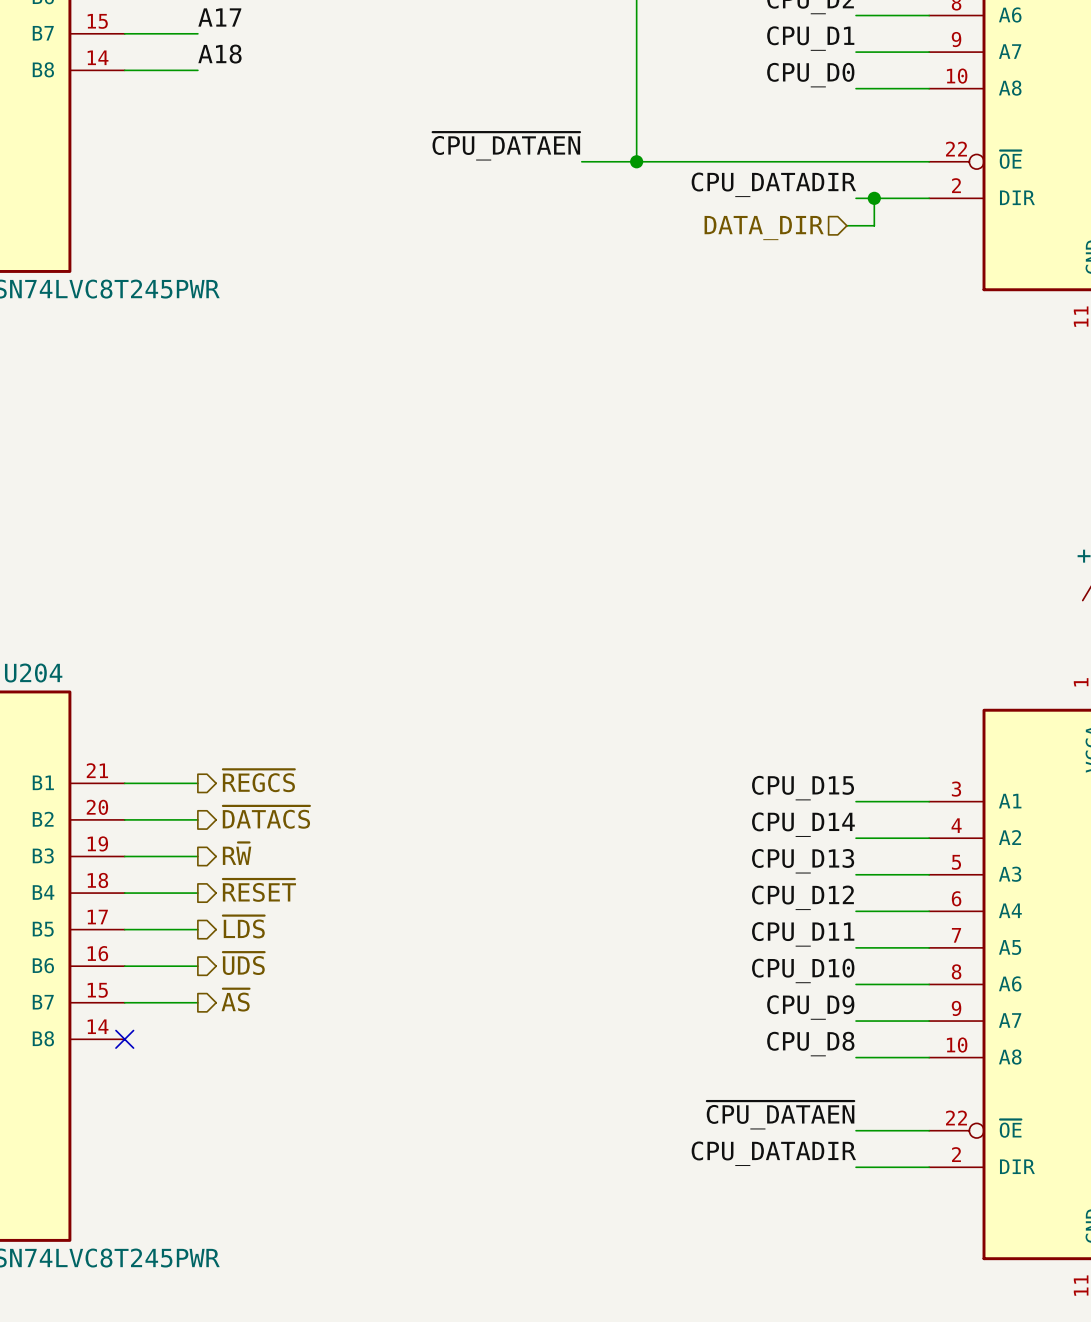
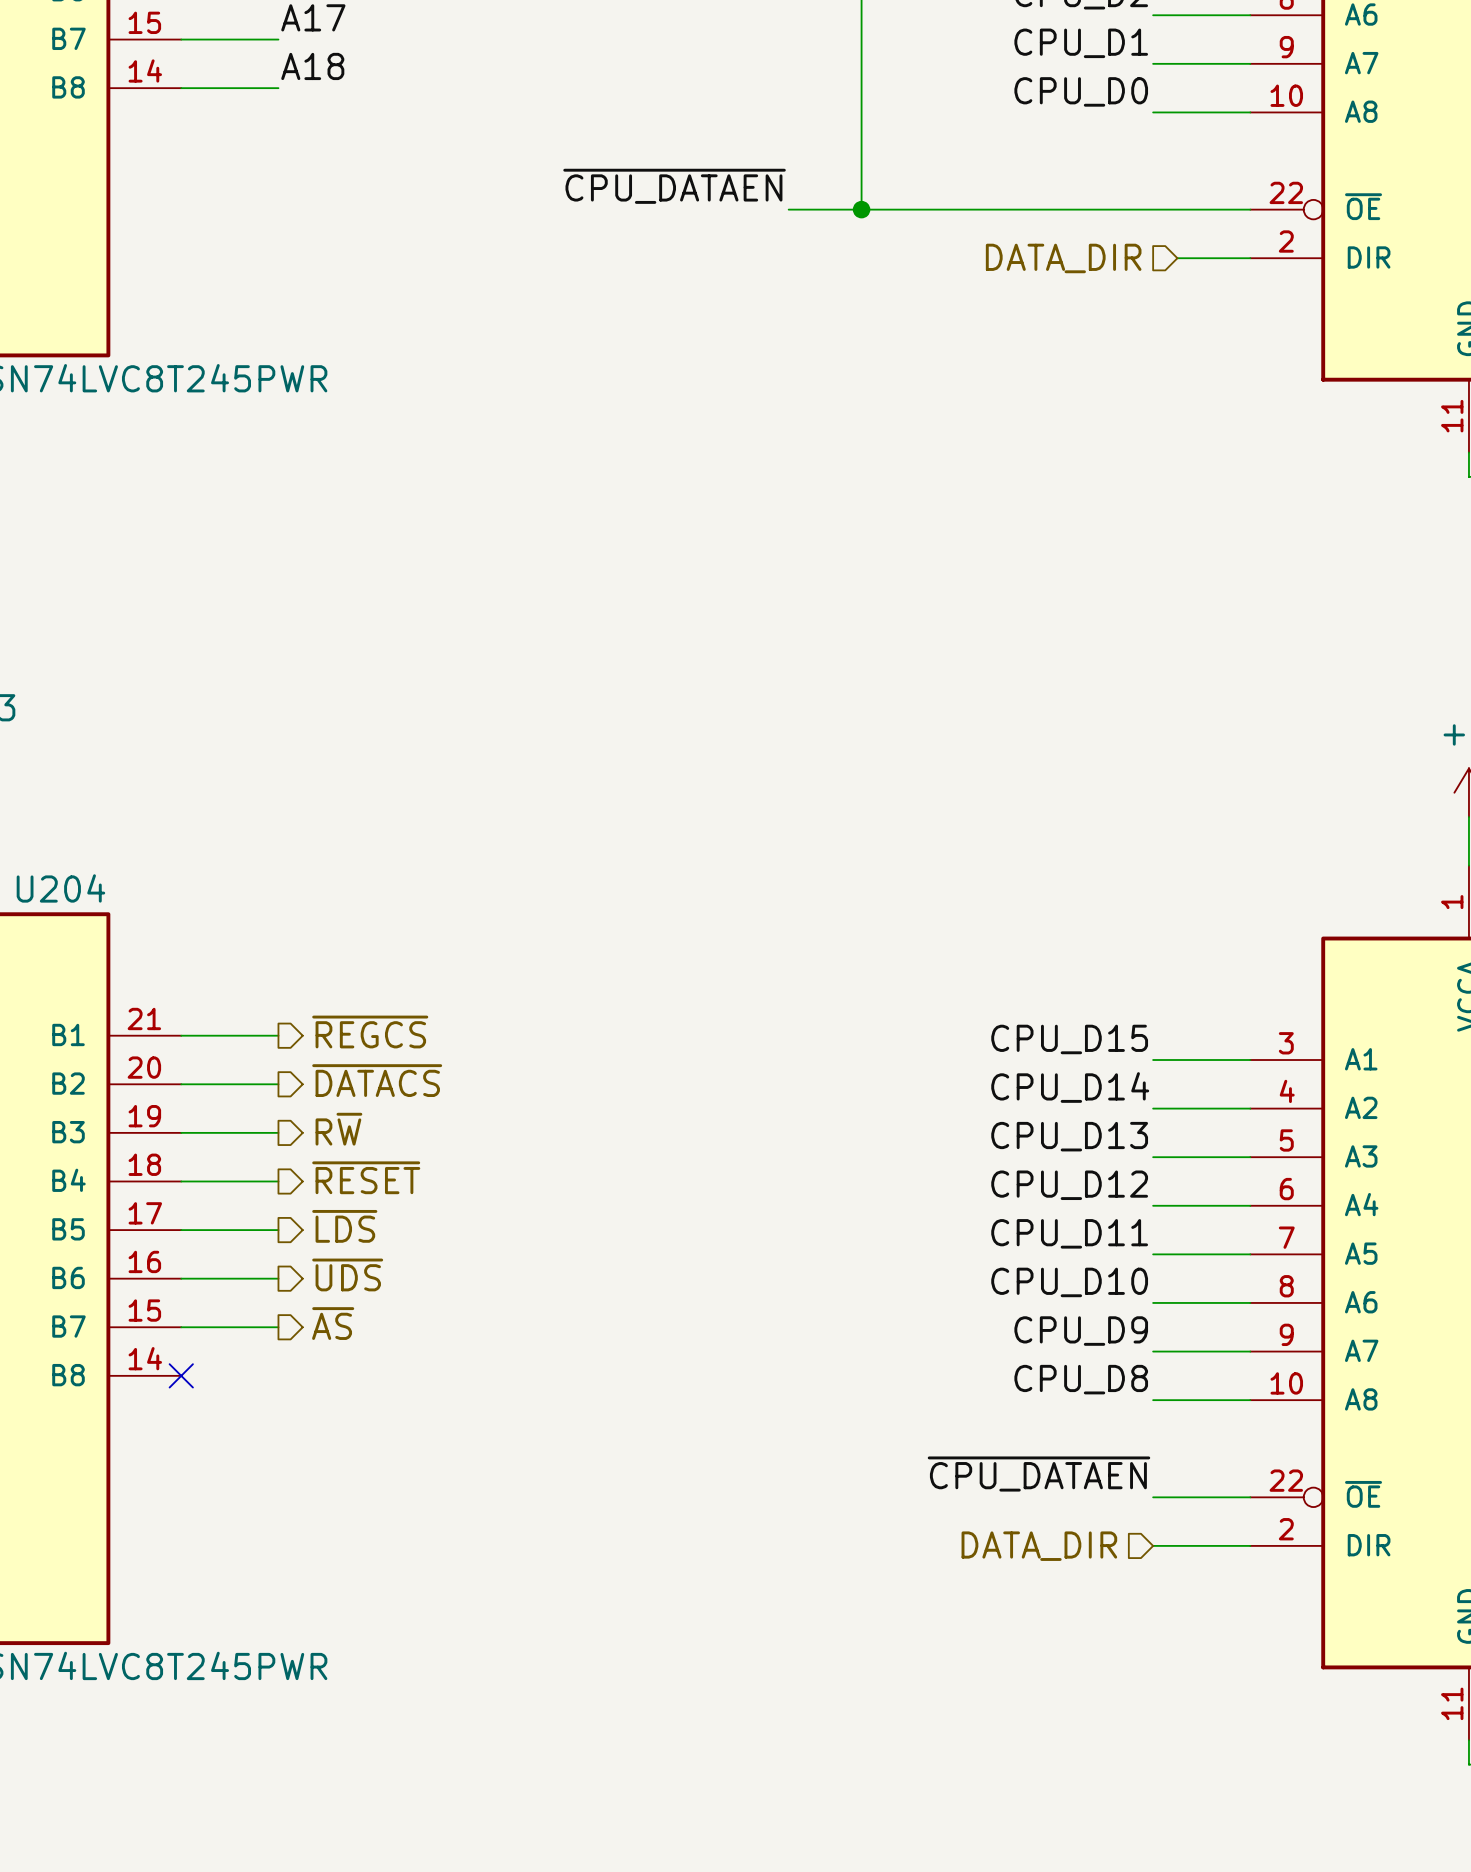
label: CPU_DATADIR (773, 184) -> none
wire: (856, 198) (874, 198) (874, 225) (846, 225) -> none
junction: (874, 198) -> none
hierarchical label position: DATA_DIR (764, 228) -> DATA_DIR (1063, 258)
label: CPU_DATADIR (773, 1153) -> none
hierarchical label: none -> DATA_DIR (1039, 1546)

